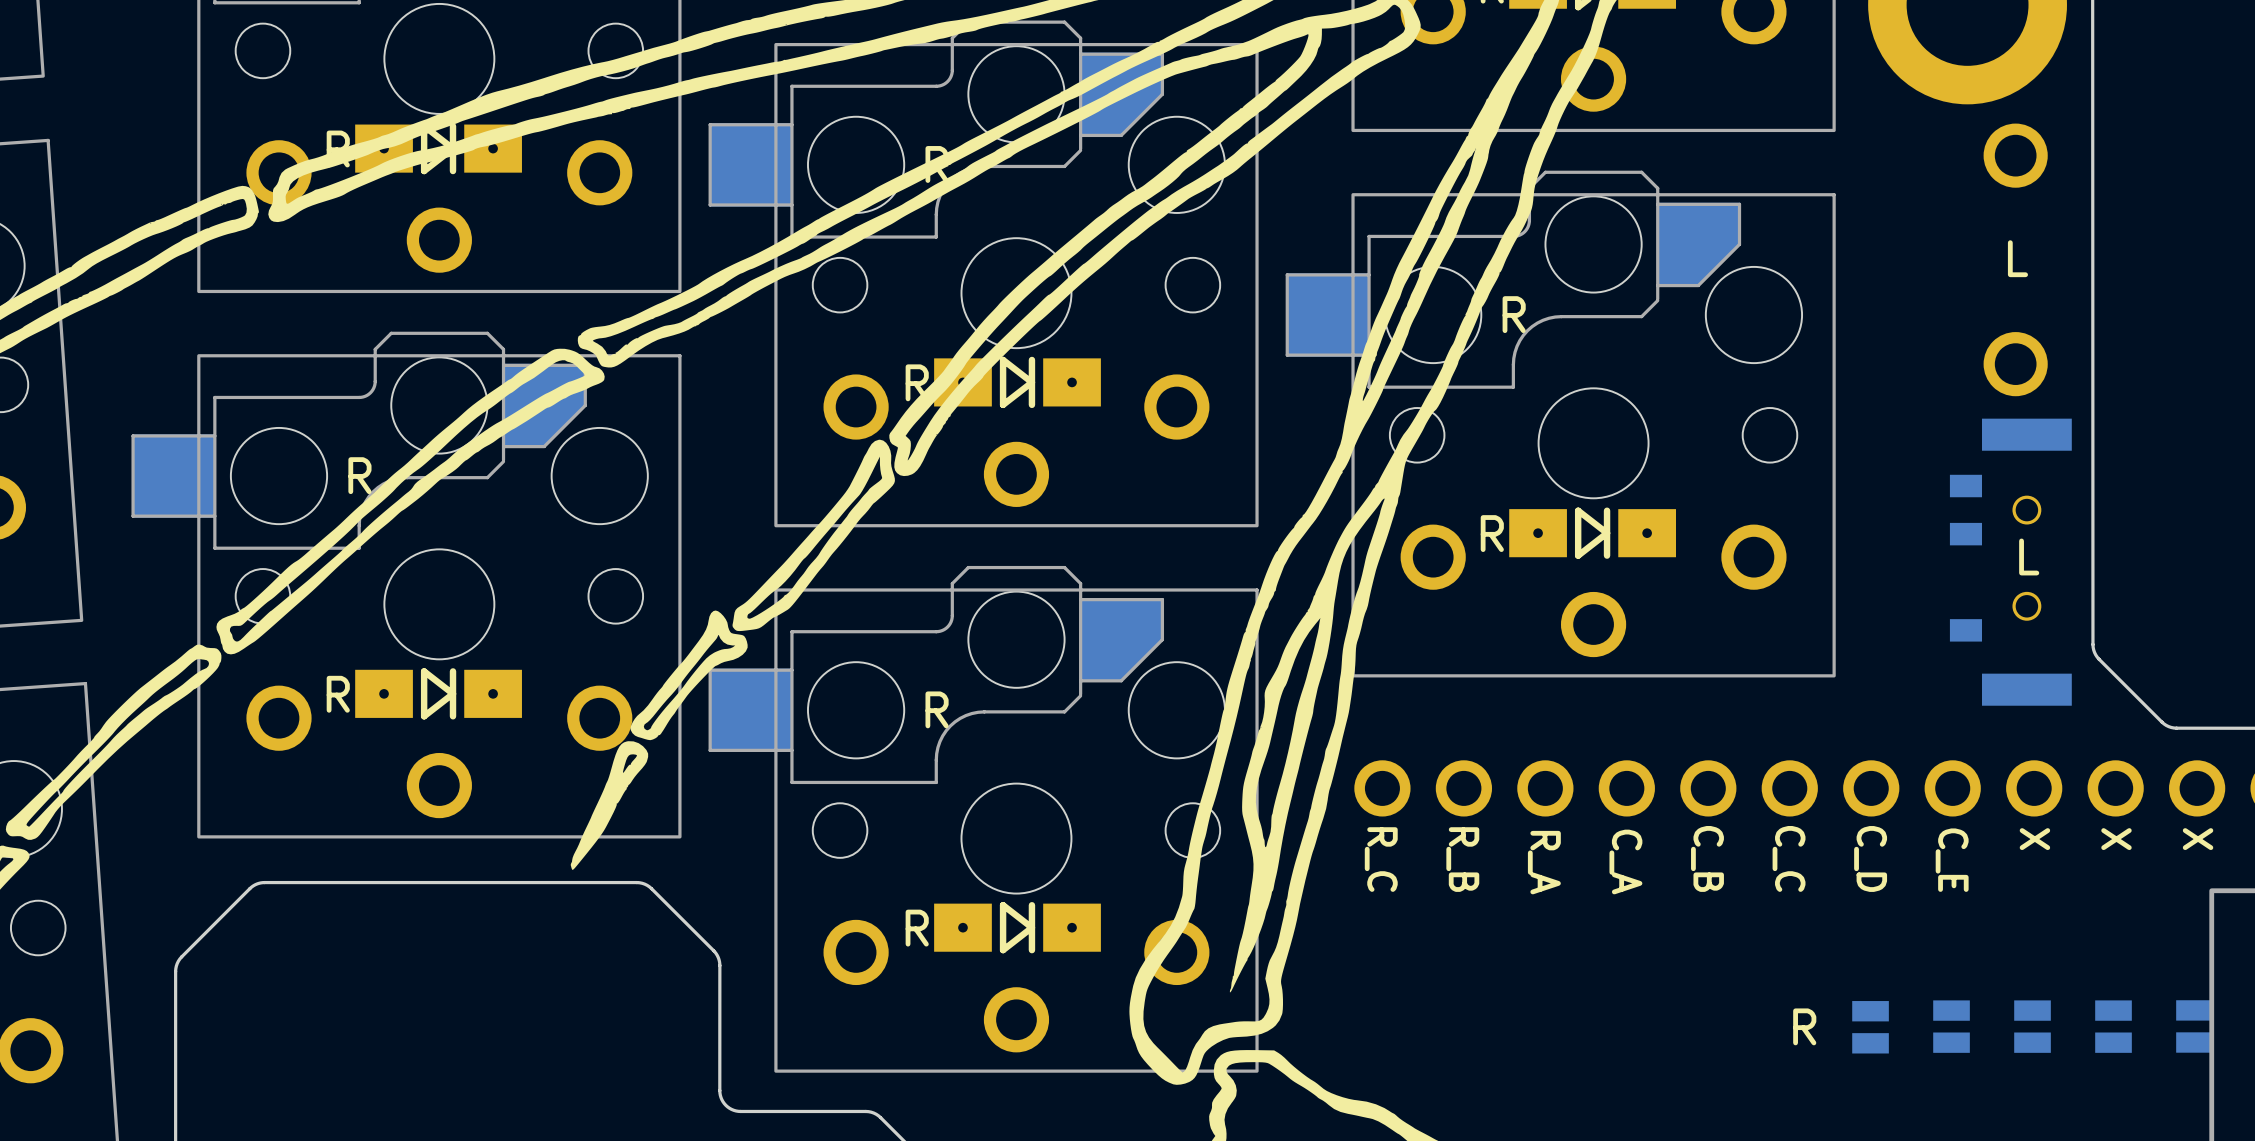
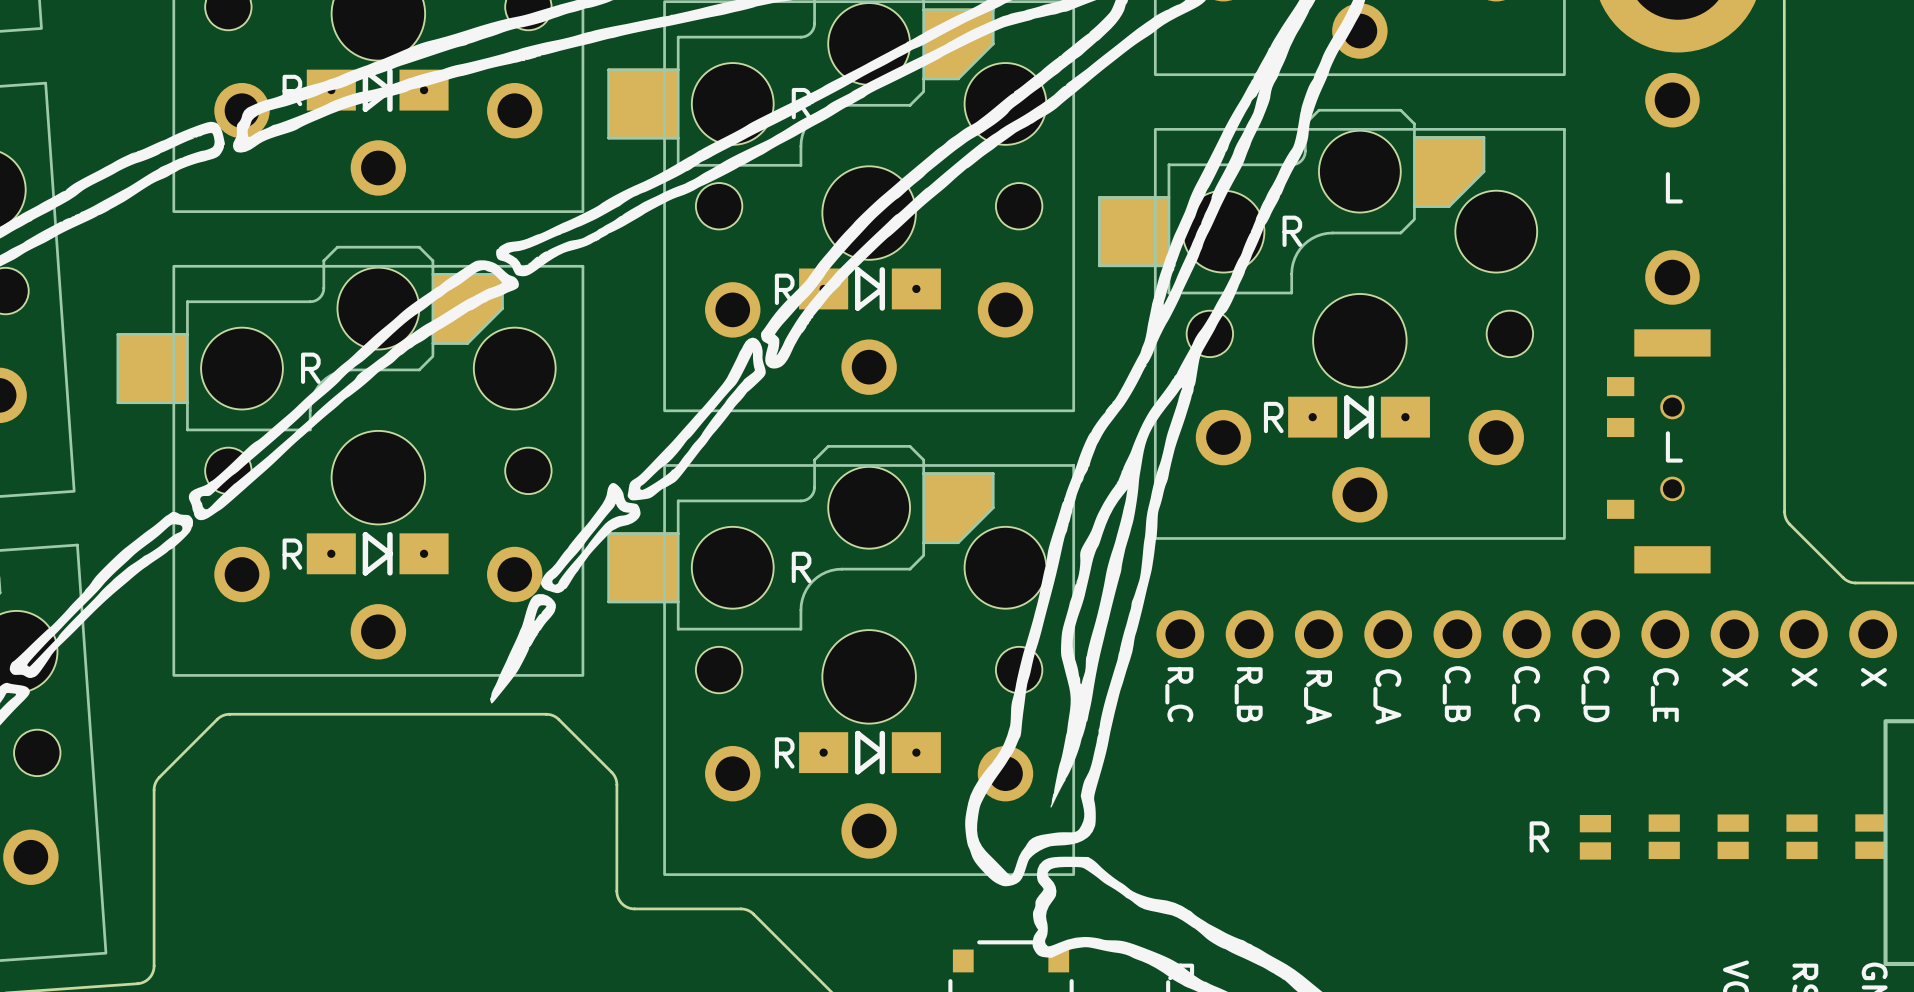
part position: (2015, 259) -> (1672, 188)
part position: (2010, 562) -> (1658, 451)

